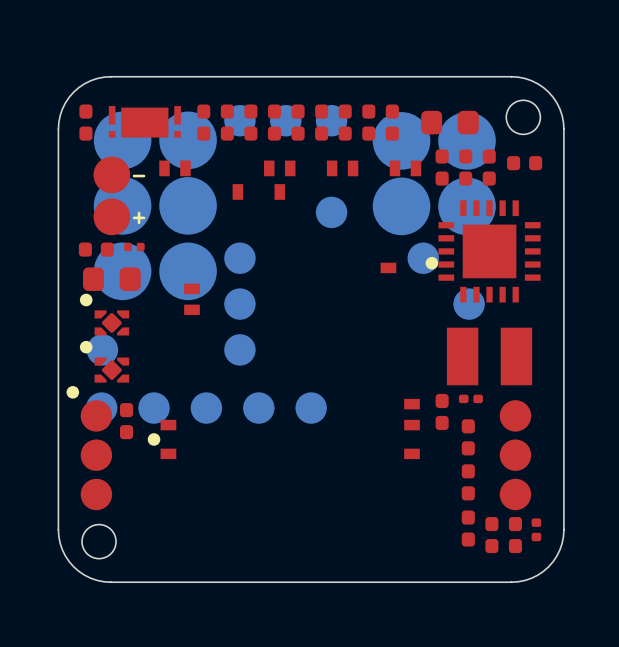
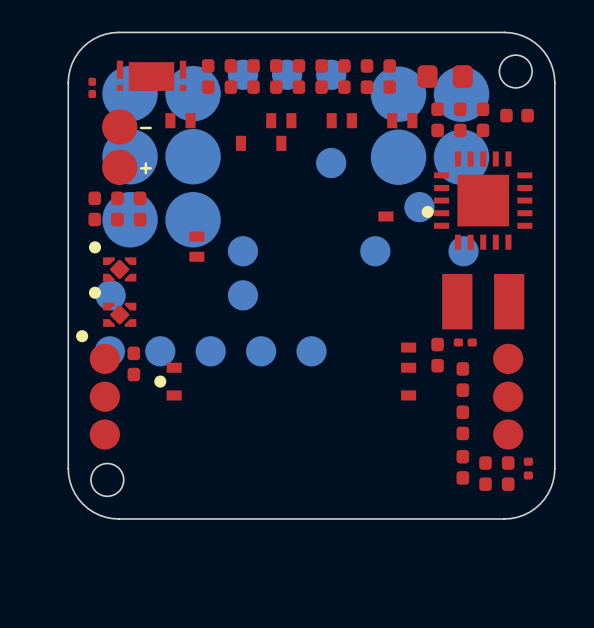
part footprint: [79, 104, 93, 141] -> [88, 77, 97, 99]
part footprint: [124, 242, 145, 252] -> [133, 191, 147, 227]
part: (96, 249) -> none
part position: (239, 258) -> (375, 251)
part: none -> (94, 208)
part: none -> (117, 208)
part: (111, 279) -> none

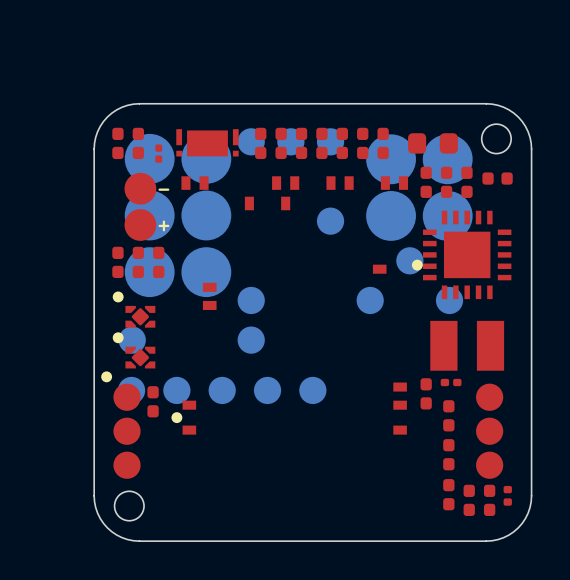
part footprint: [201, 59, 215, 94] -> [176, 129, 239, 157]
part footprint: [116, 60, 187, 92] -> [155, 144, 163, 163]
part position: (230, 76) -> (138, 143)
part footprint: [88, 77, 97, 99] -> [112, 127, 124, 160]

